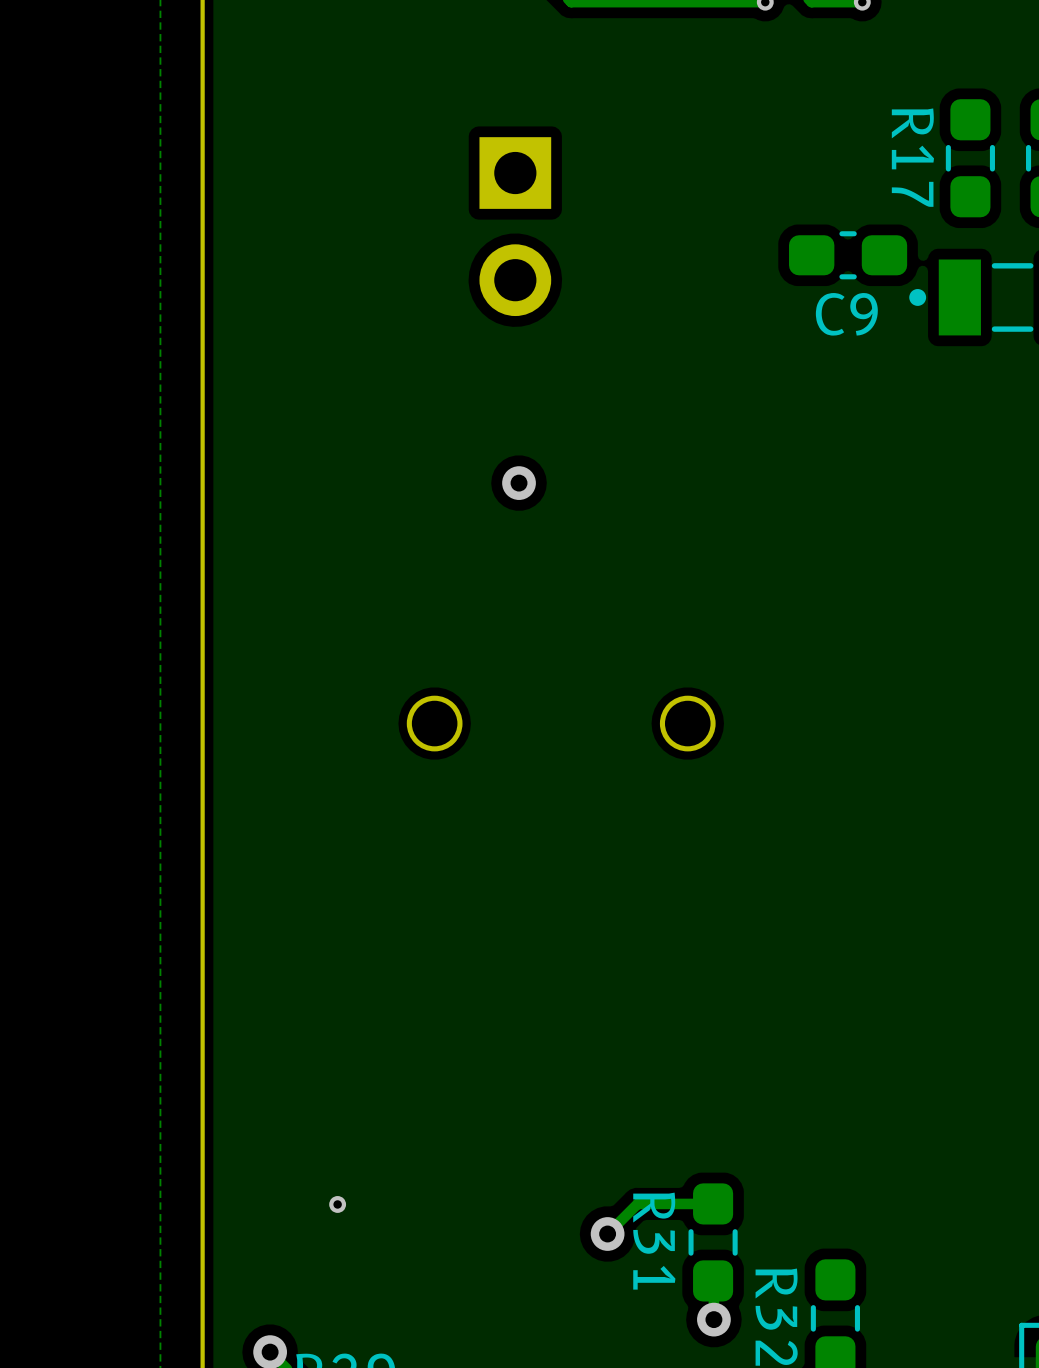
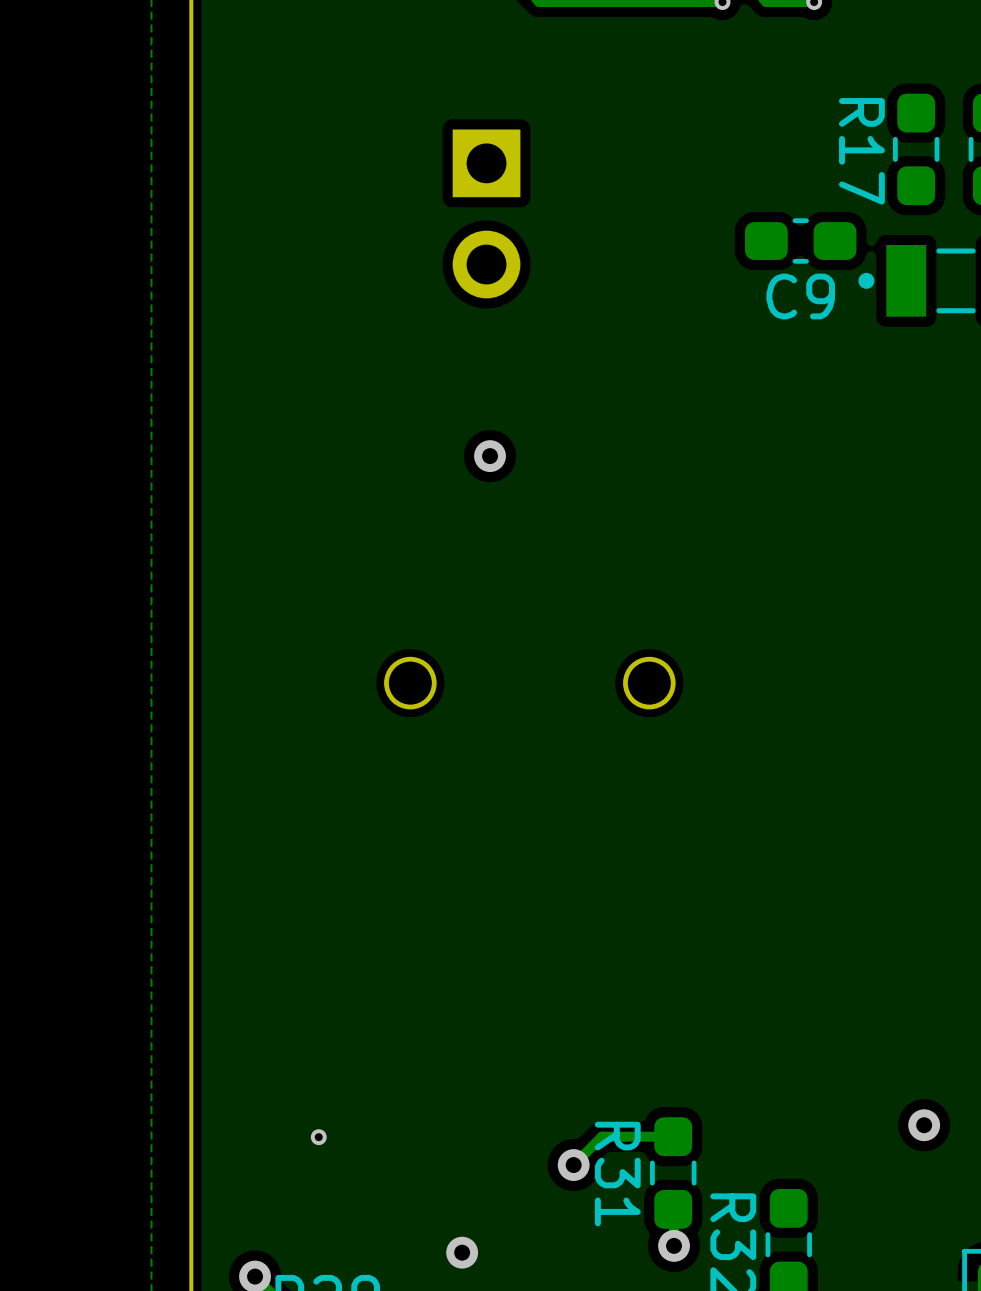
via: none -> (924, 1125)
via: none -> (462, 1252)

